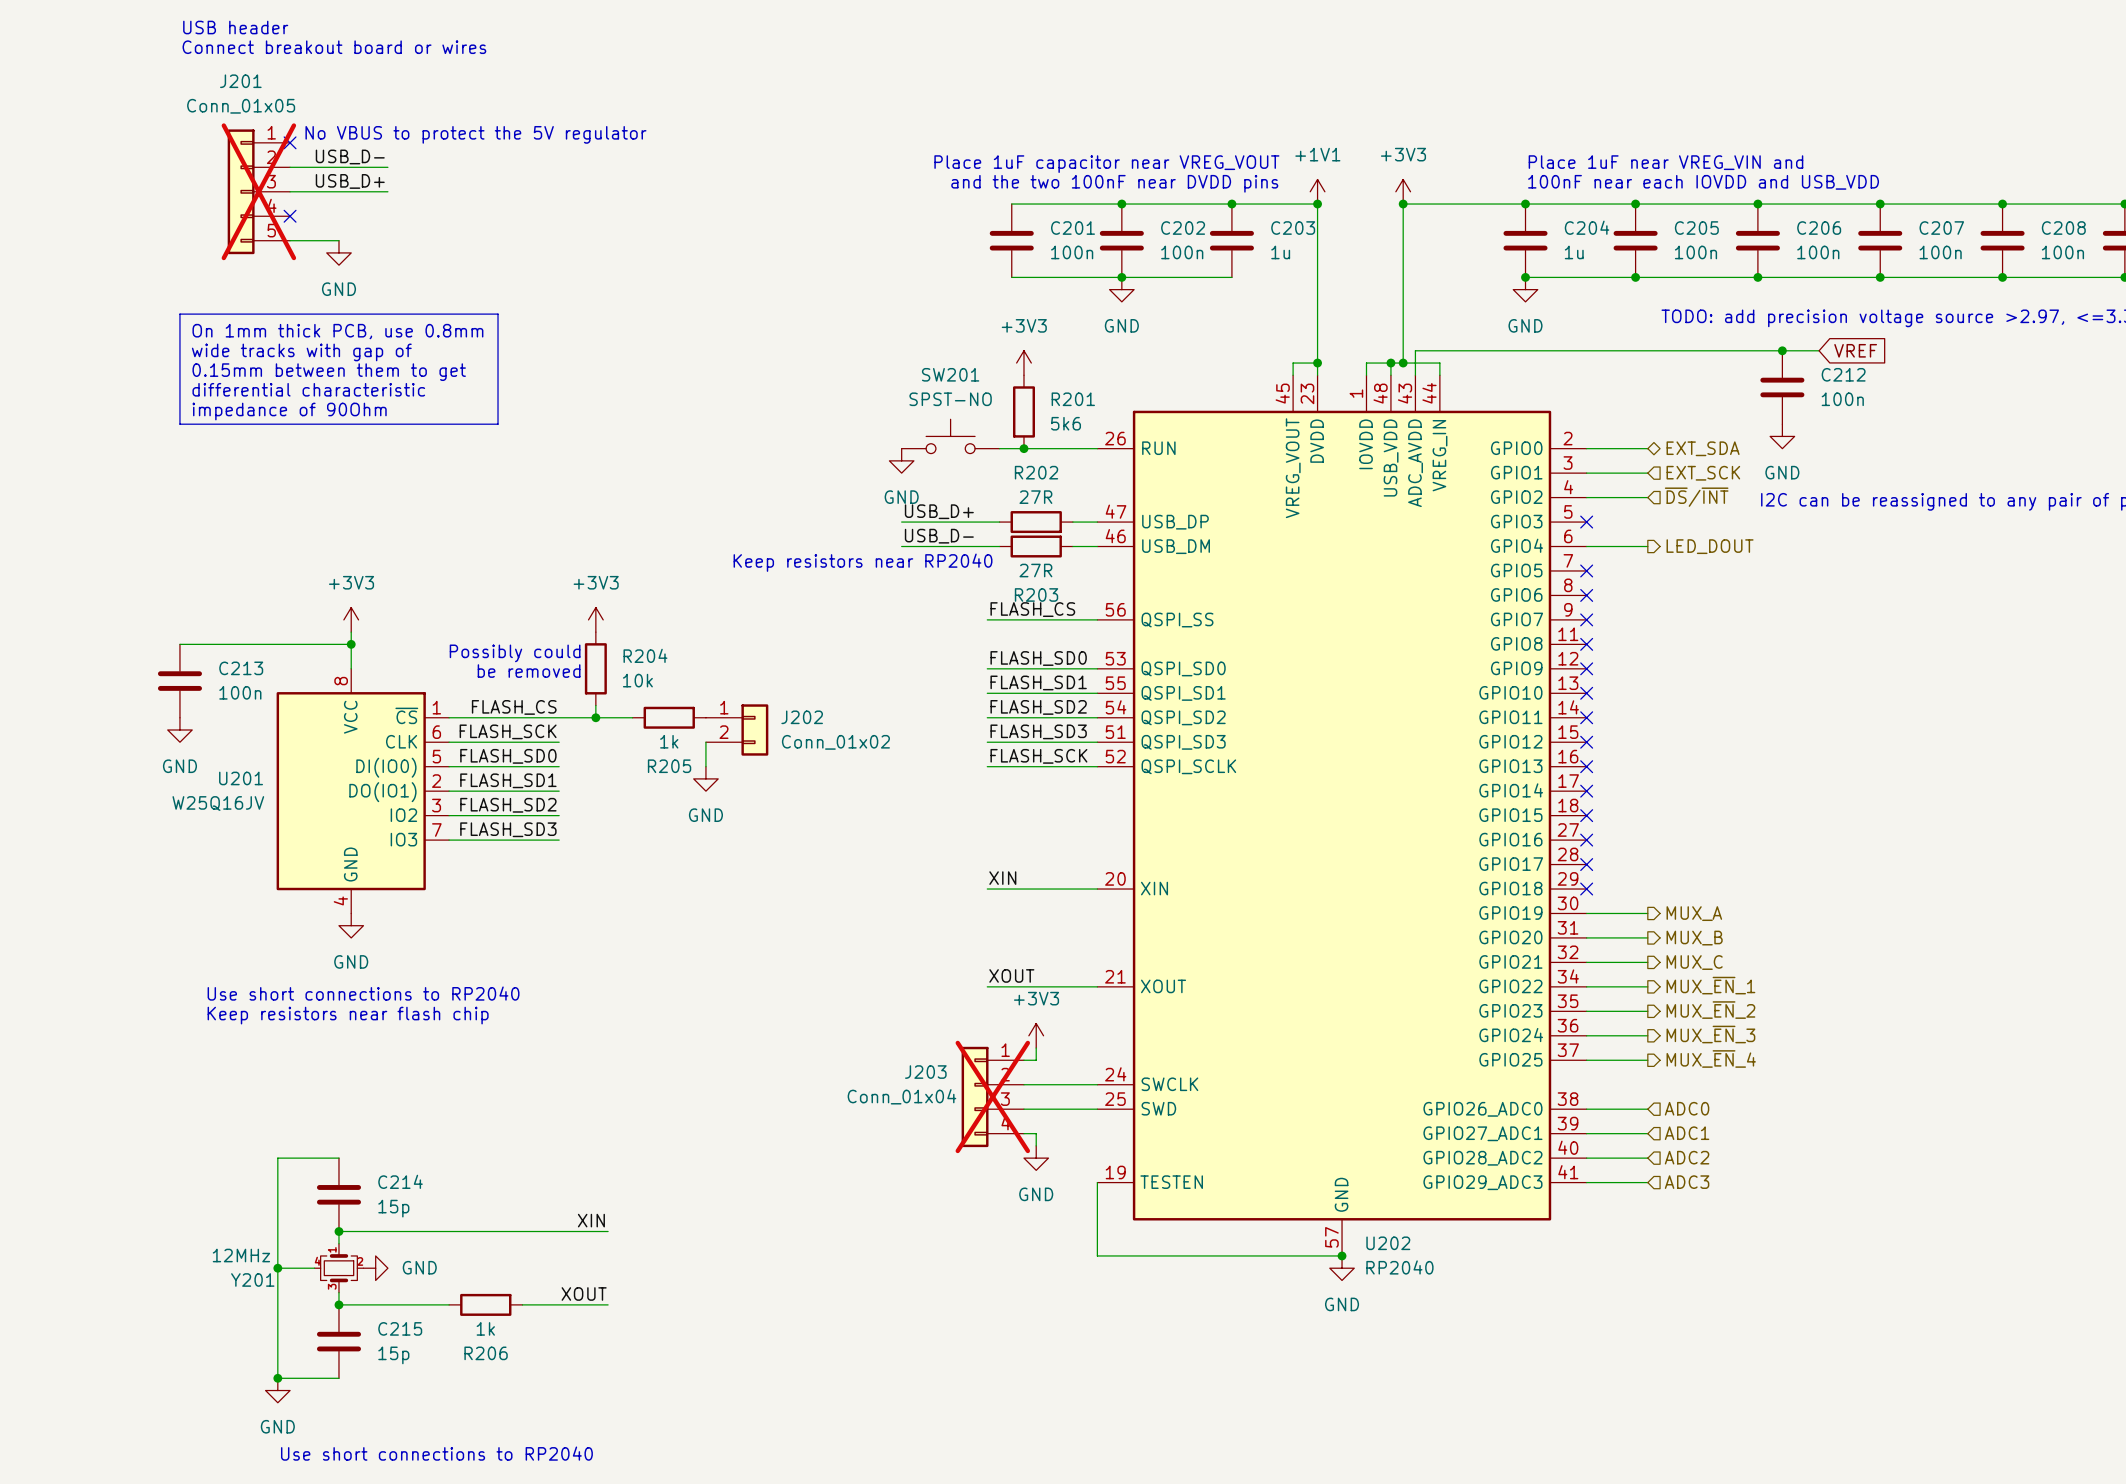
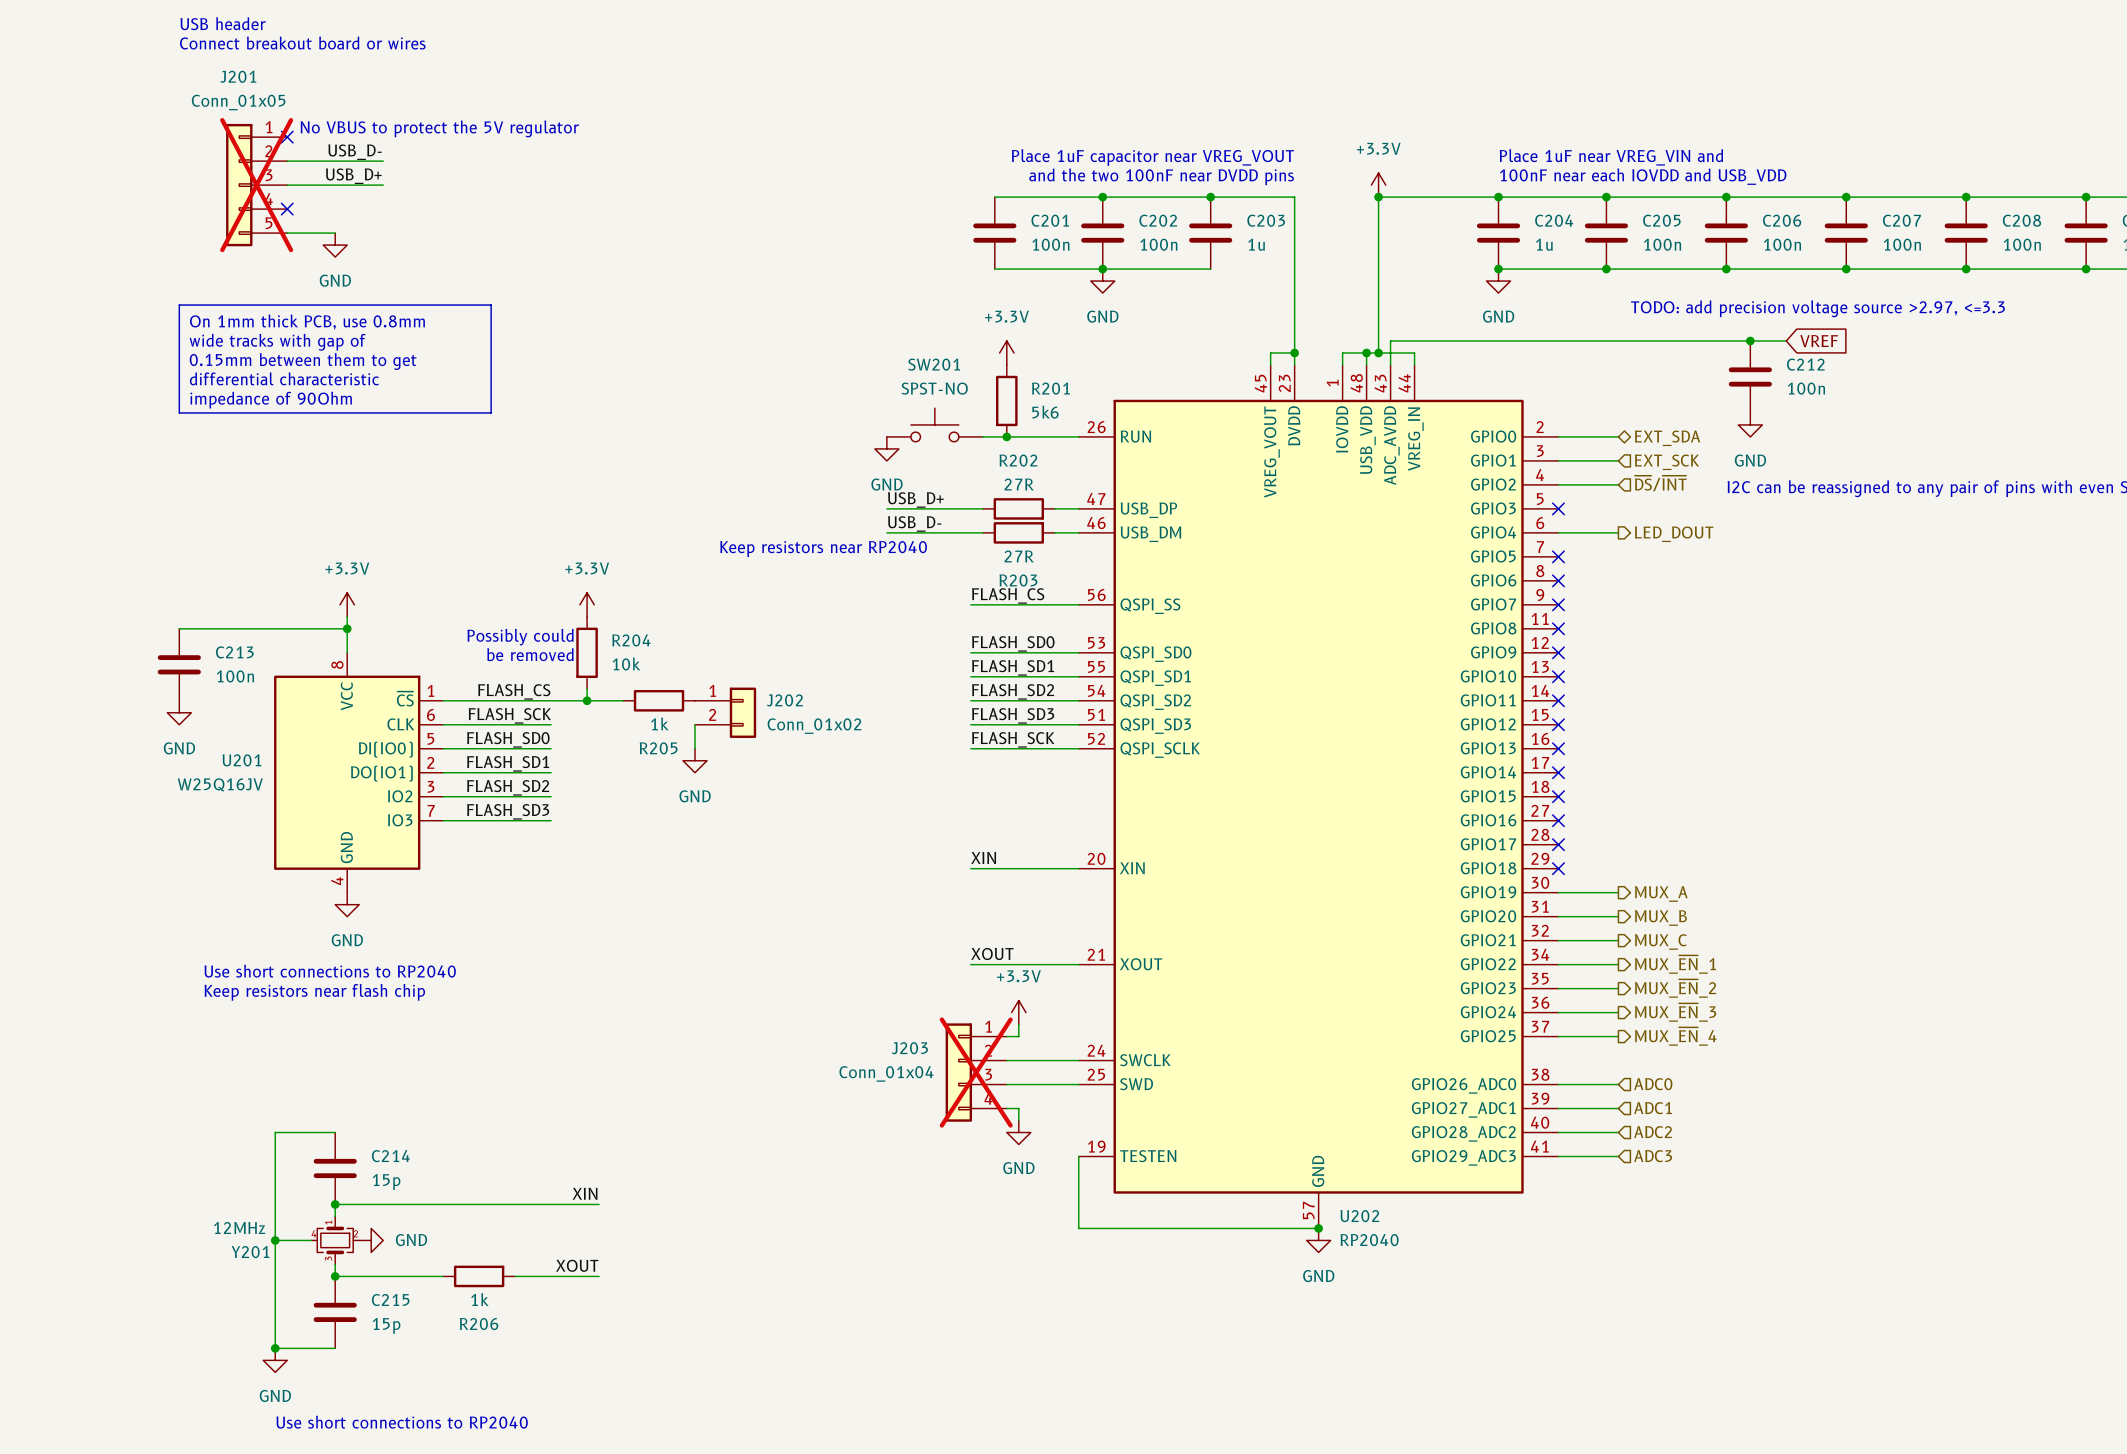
text position: Place 1uF capacitor near VREG_VOUT (1106, 164) -> Place 1uF capacitor near VREG_VOUT (1152, 157)
text position: and the two 100nF near DVDD pins (1114, 183) -> and the two 100nF near DVDD pins (1161, 176)
power symbol: +1V1 (1317, 191) -> none
power symbol: +3V3 (1403, 191) -> +3.3V (1378, 185)
junction: (1317, 204) -> none
power symbol: +3V3 (1023, 363) -> +3.3V (1006, 353)
power symbol: +3V3 (351, 619) -> +3.3V (347, 604)
power symbol: +3V3 (595, 619) -> +3.3V (587, 604)
power symbol: +3V3 (1036, 1035) -> +3.3V (1018, 1012)

